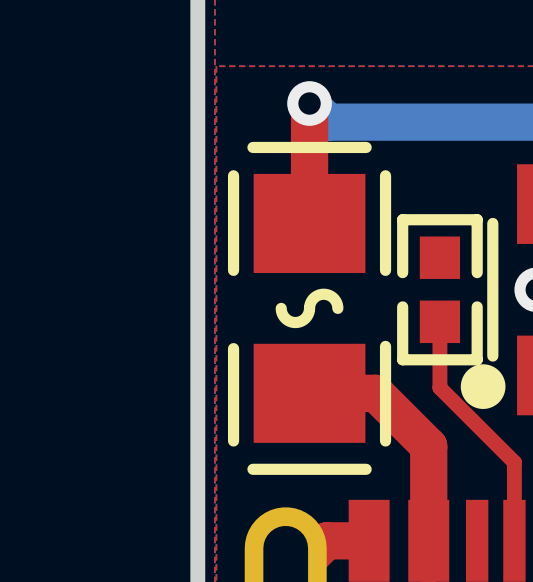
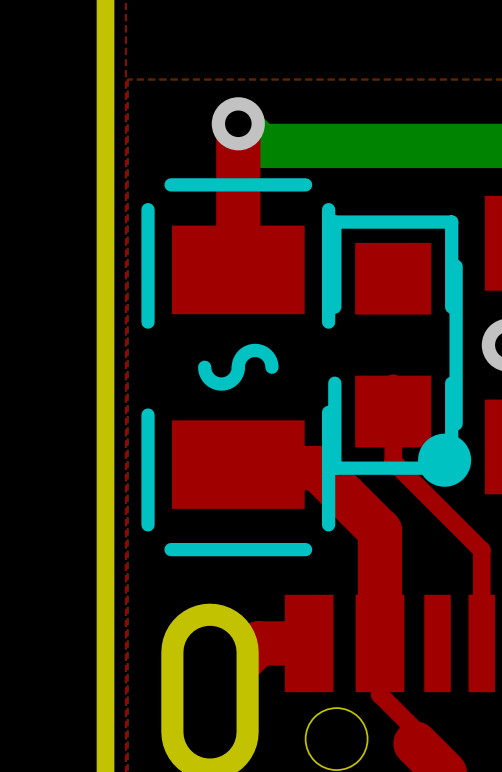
part footprint: [227, 141, 392, 475] -> [141, 178, 336, 557]
part footprint: [397, 214, 483, 366] -> [328, 215, 459, 475]

